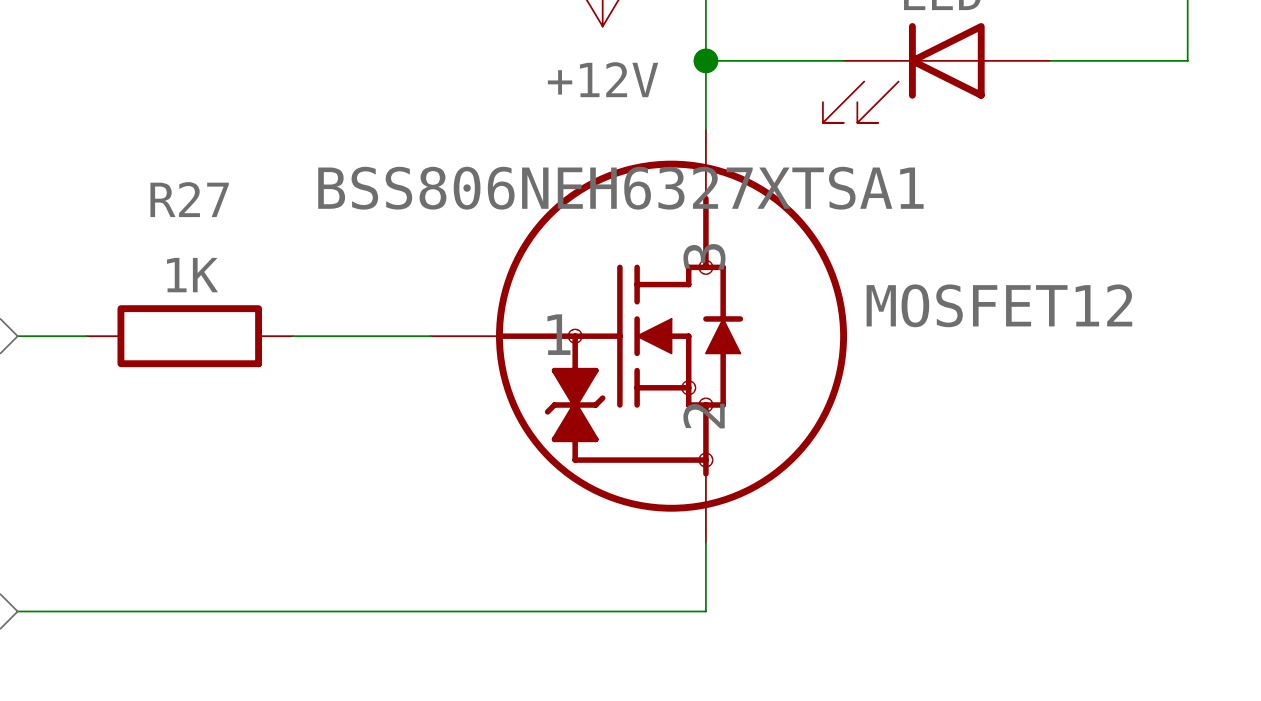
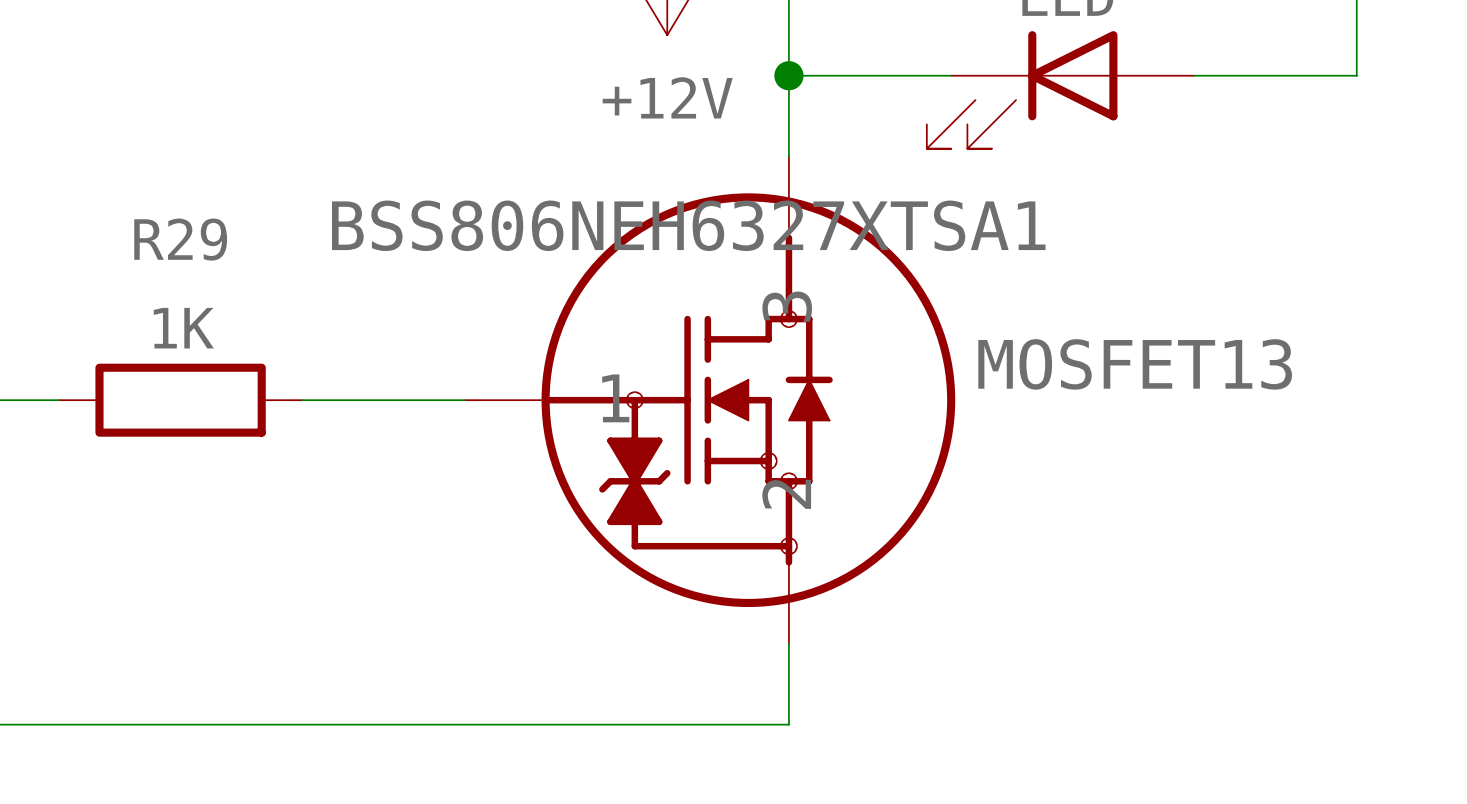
R27 name: R27 (189, 199) -> R29 (180, 239)
MOSFET12 name: MOSFET12 (999, 305) -> MOSFET13 (1135, 364)

